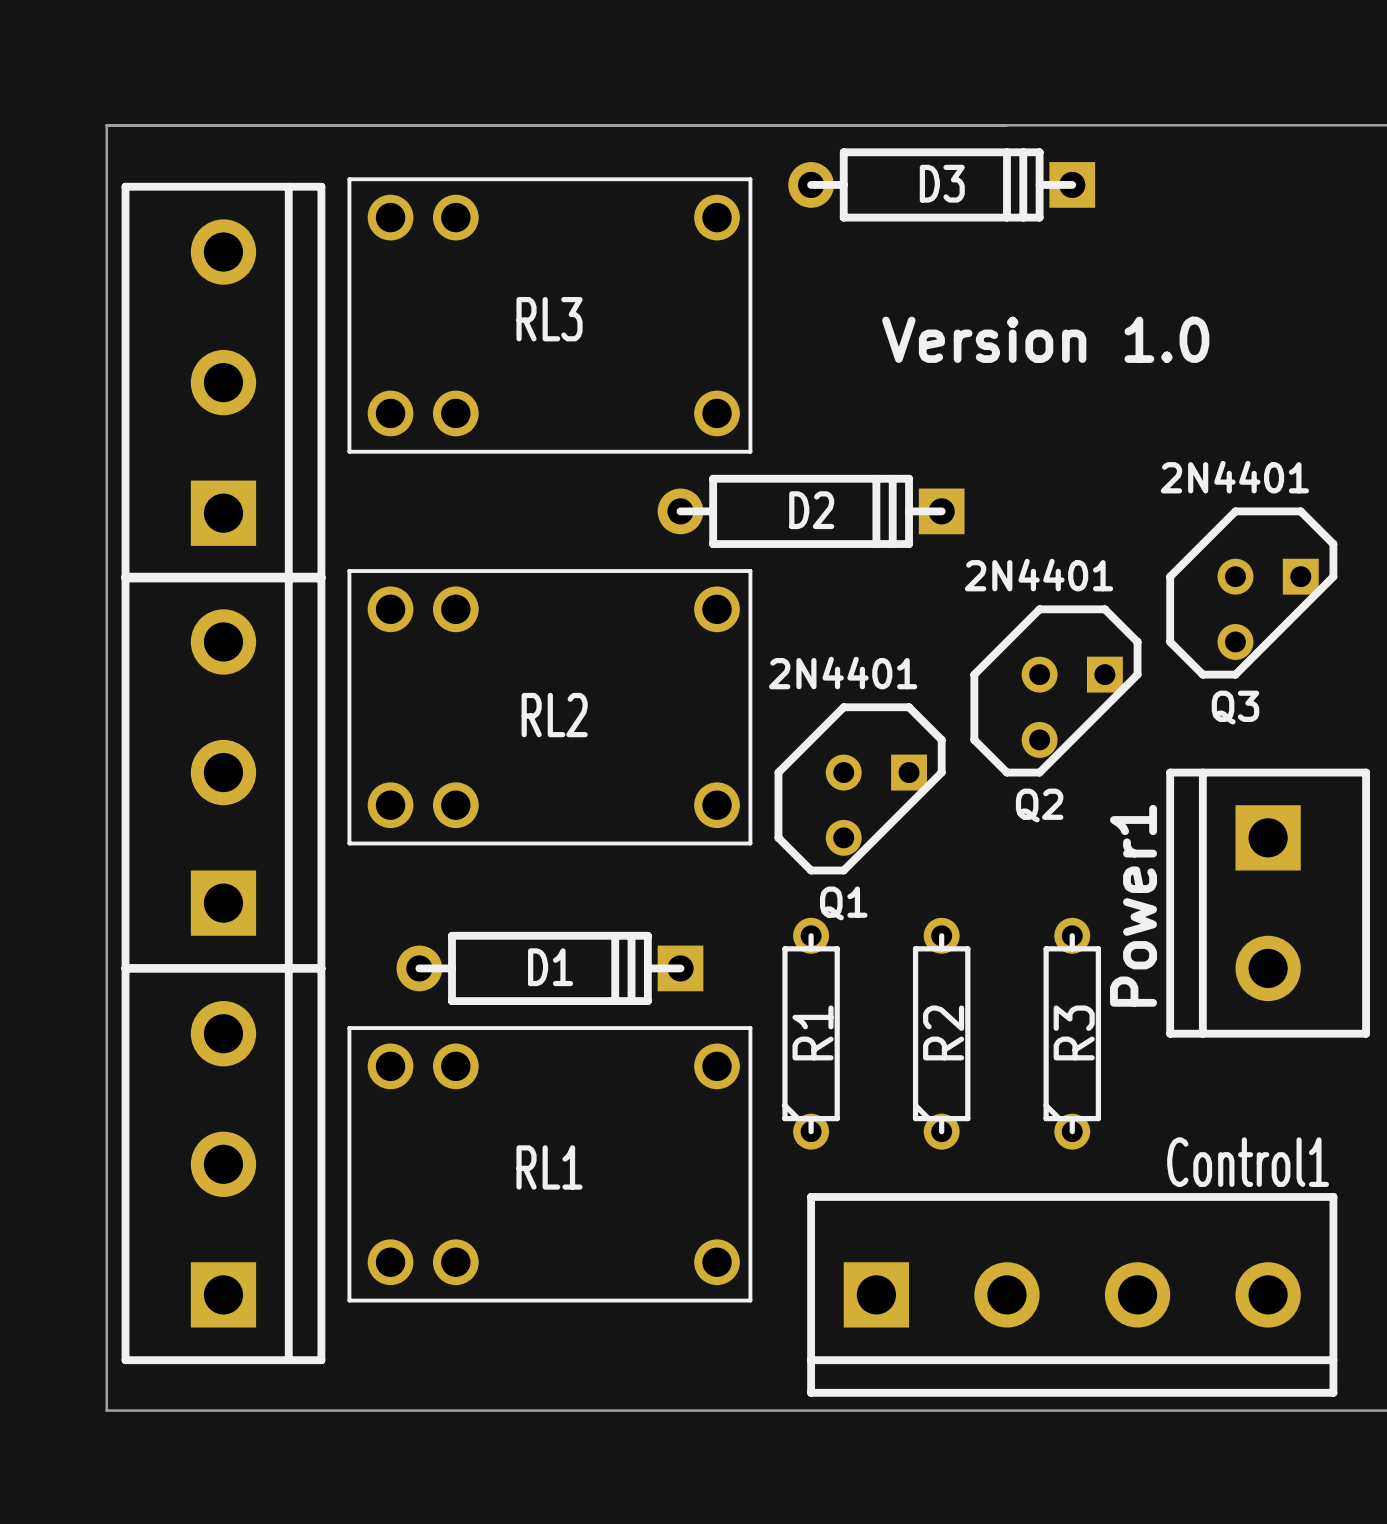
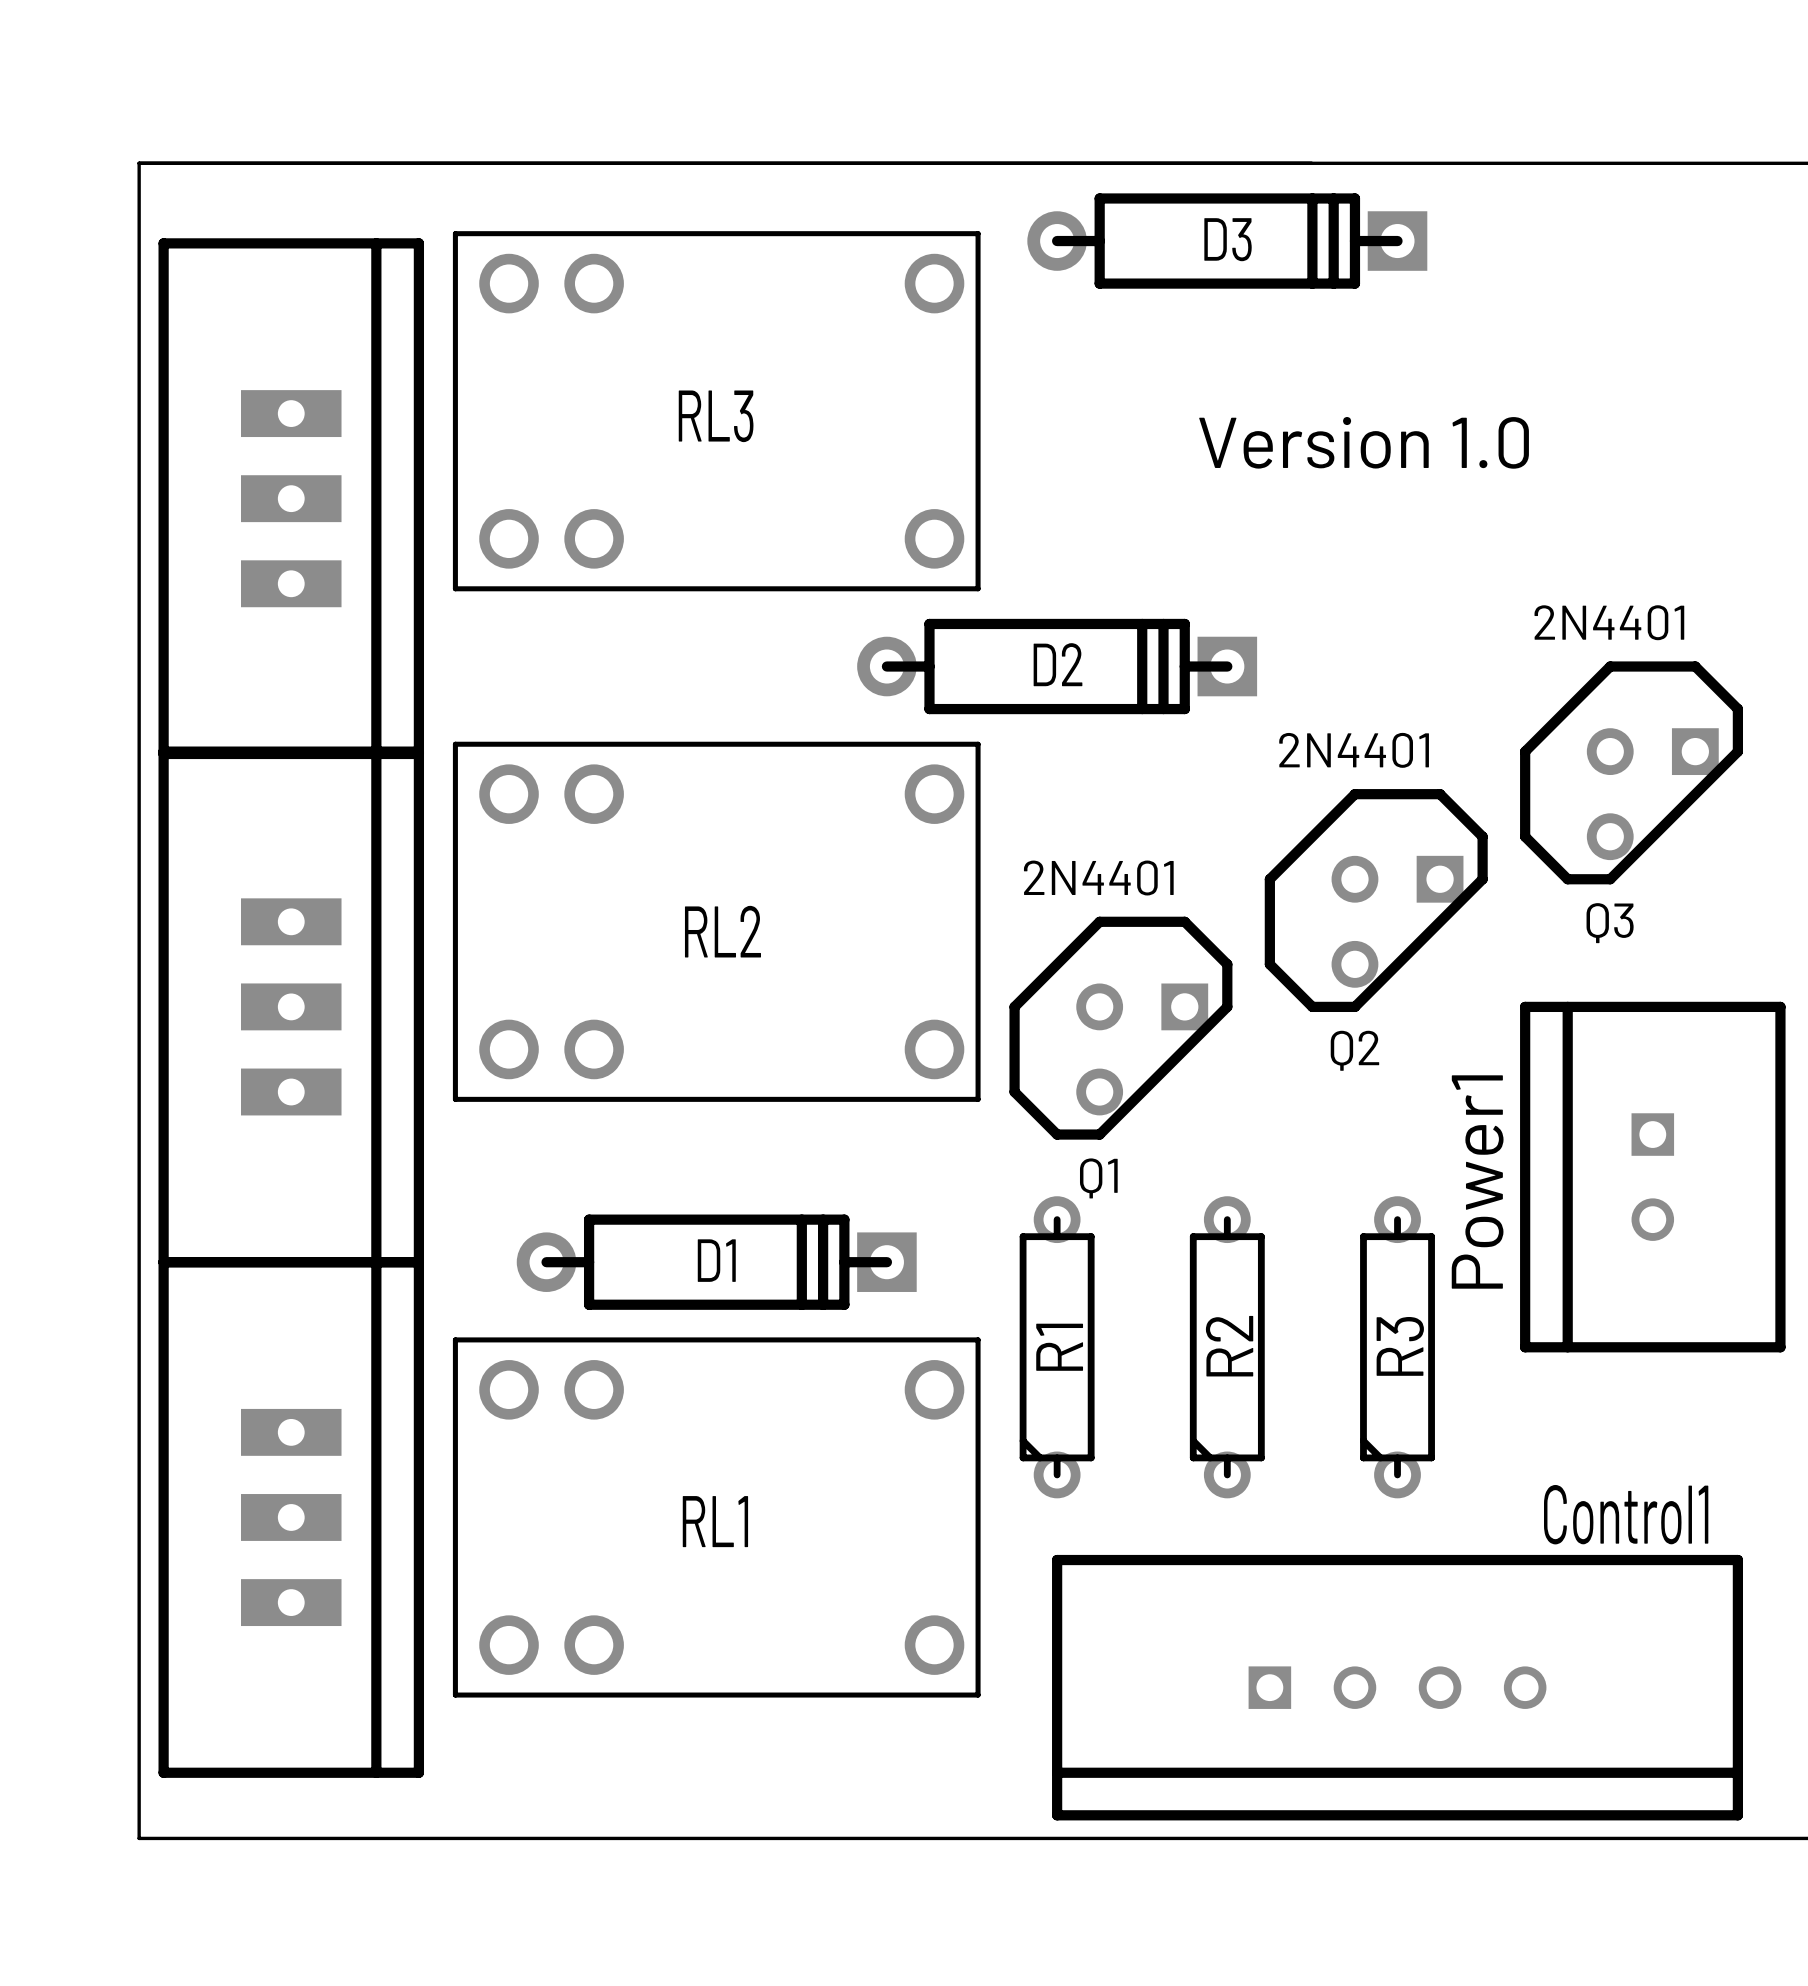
part footprint: [121, 182, 326, 583] -> [158, 238, 425, 760]
part footprint: [121, 572, 326, 973] -> [158, 746, 425, 1268]
Power1 footprint: [1166, 768, 1370, 1038] -> [1520, 1001, 1786, 1353]
part footprint: [121, 964, 326, 1365] -> [158, 1257, 425, 1778]
Control1 footprint: [807, 1193, 1338, 1397] -> [1052, 1554, 1744, 1821]

